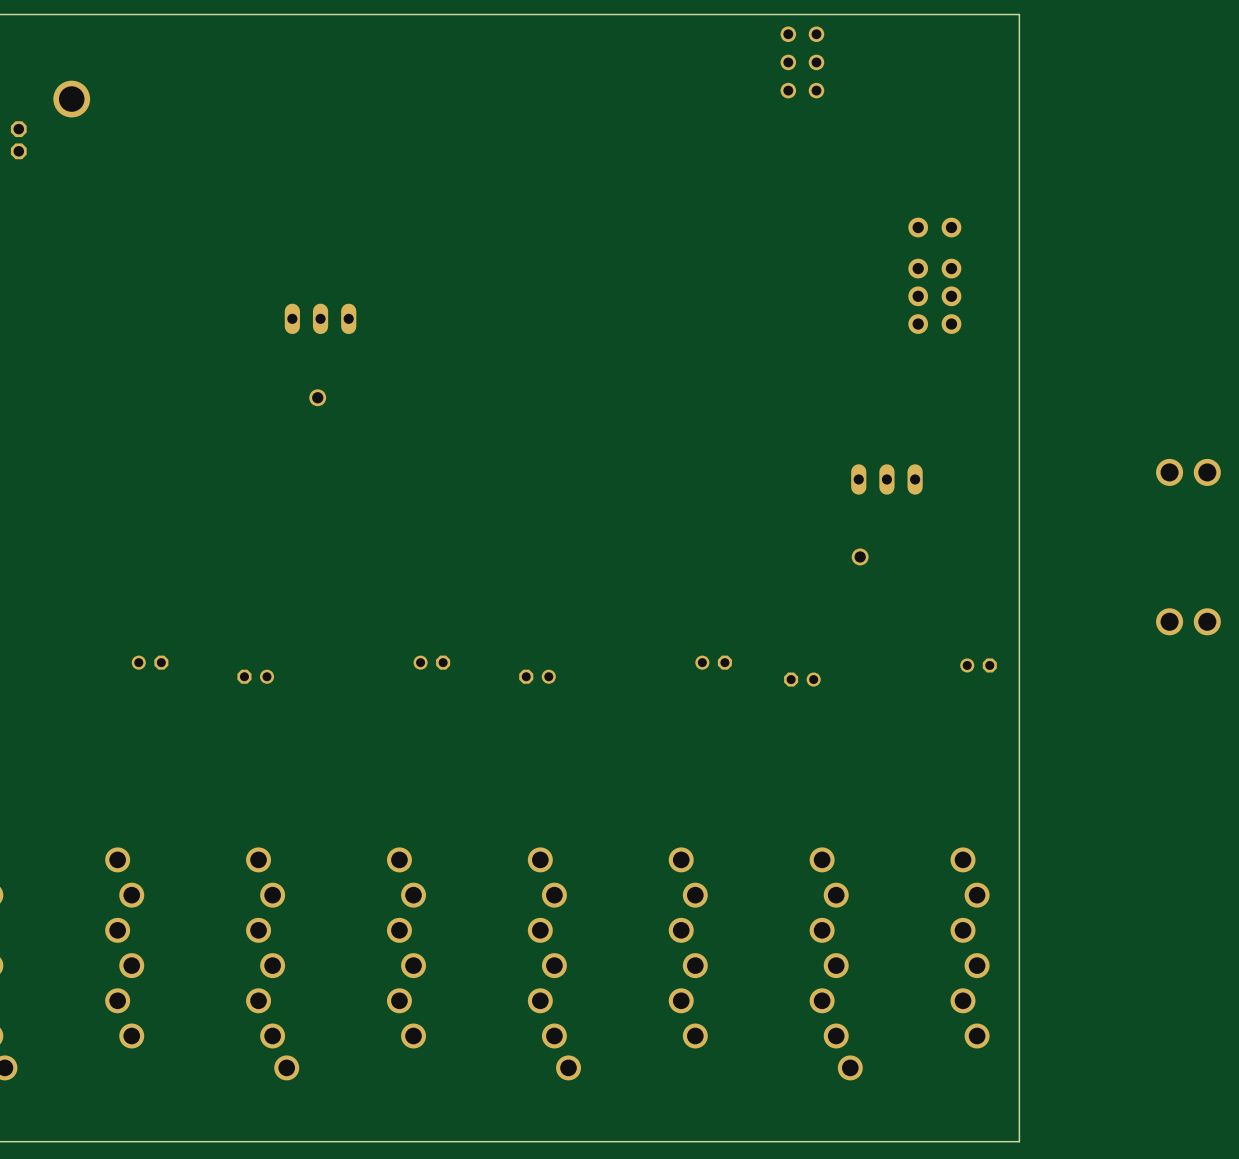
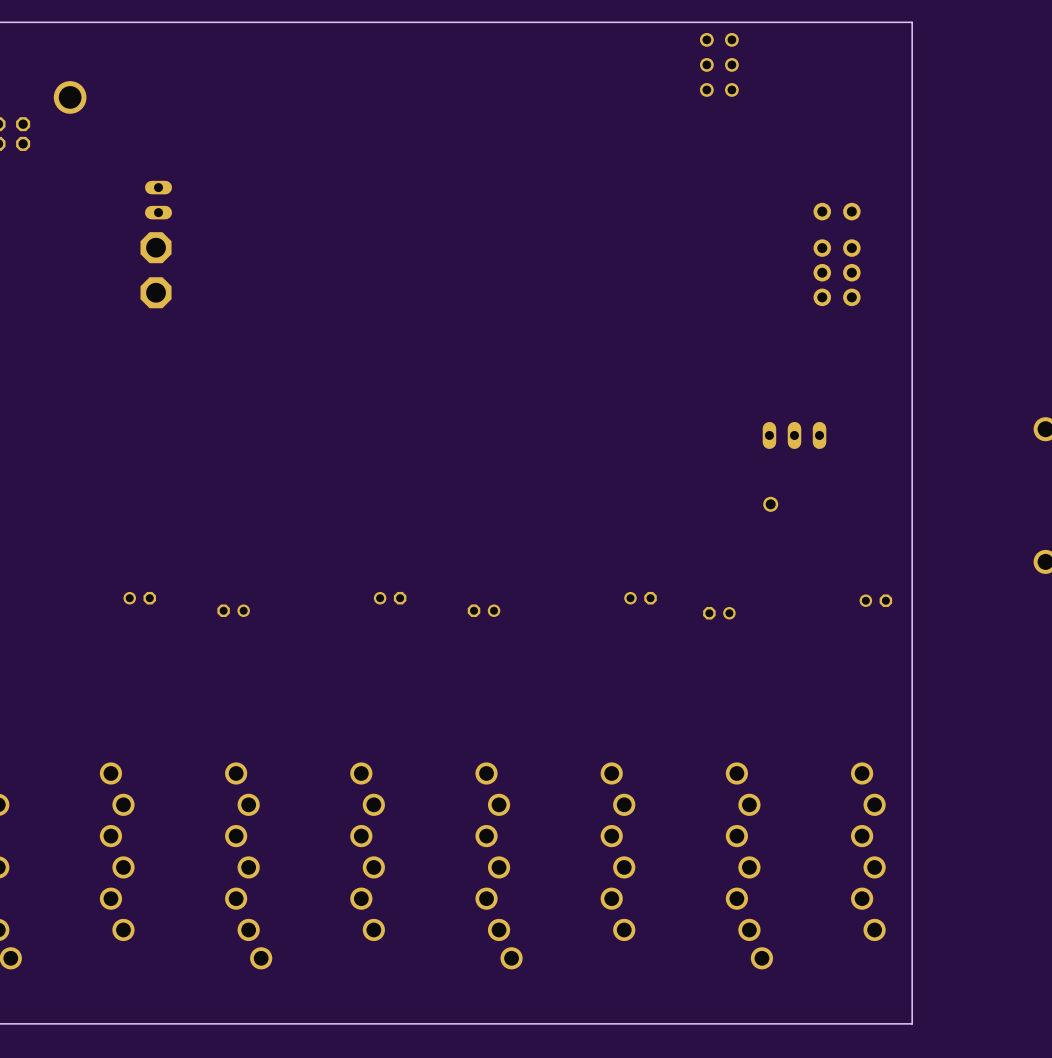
part: none -> (158, 200)
part: none -> (156, 247)
part: none -> (156, 292)
part: (320, 318) -> none
part: (317, 397) -> none

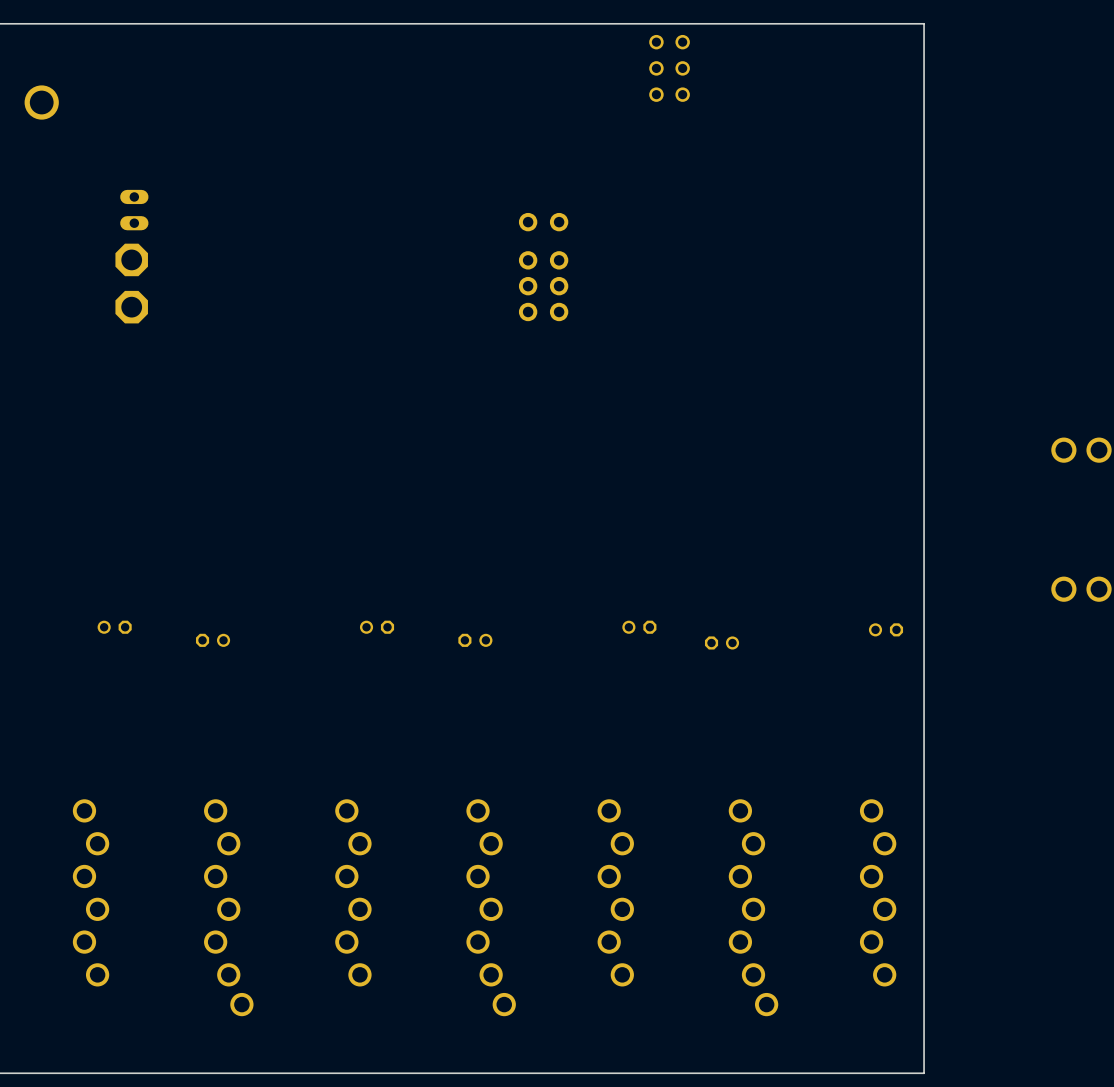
part position: (719, 64) -> (669, 68)
part: none -> (543, 267)
part: (837, 254) -> none
part: (794, 435) -> none
part: (770, 504) -> none

